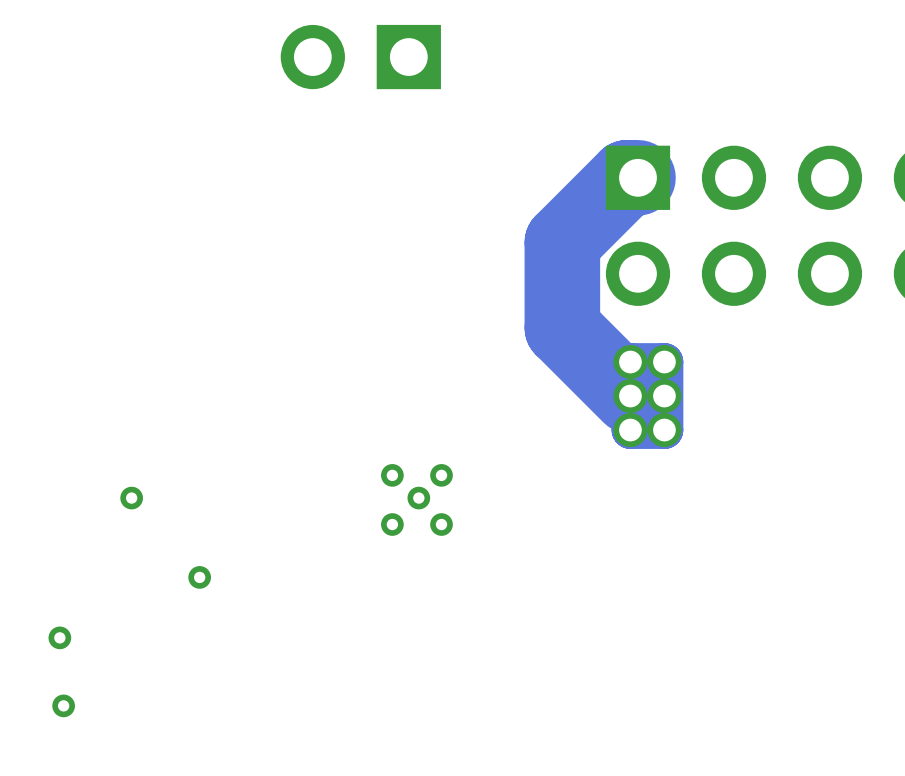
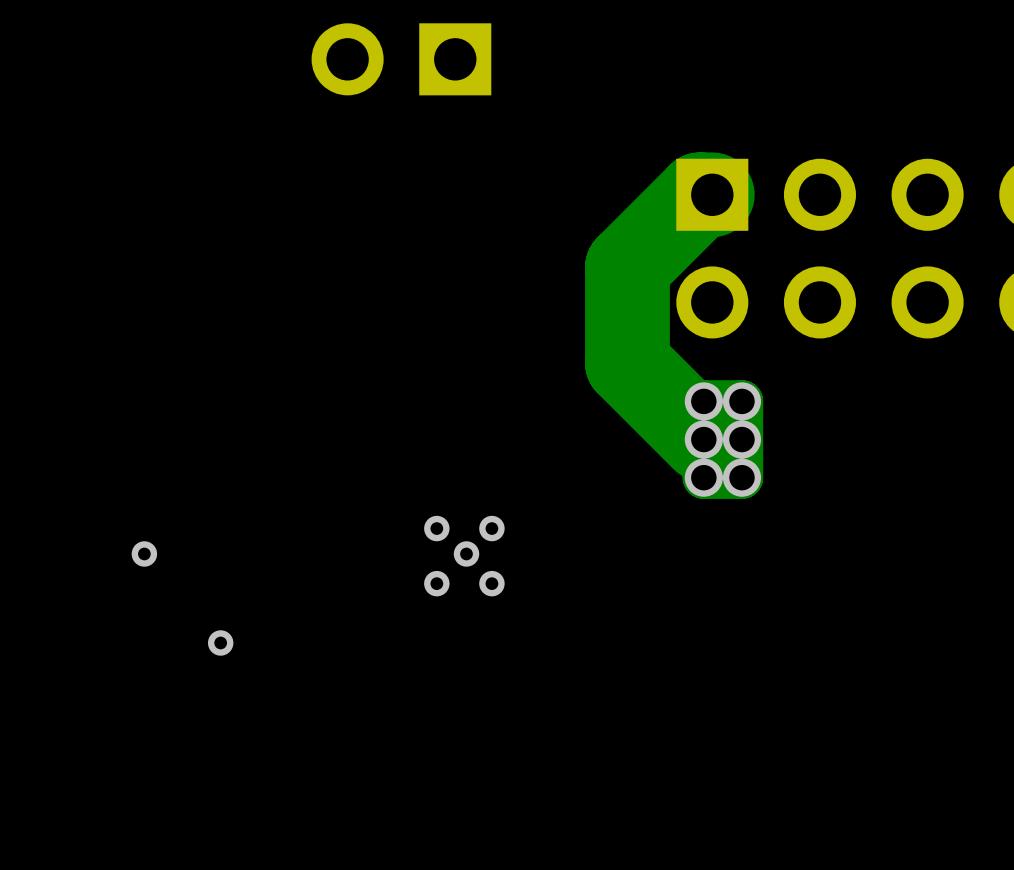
via: (59, 637) -> none
via: (63, 705) -> none

